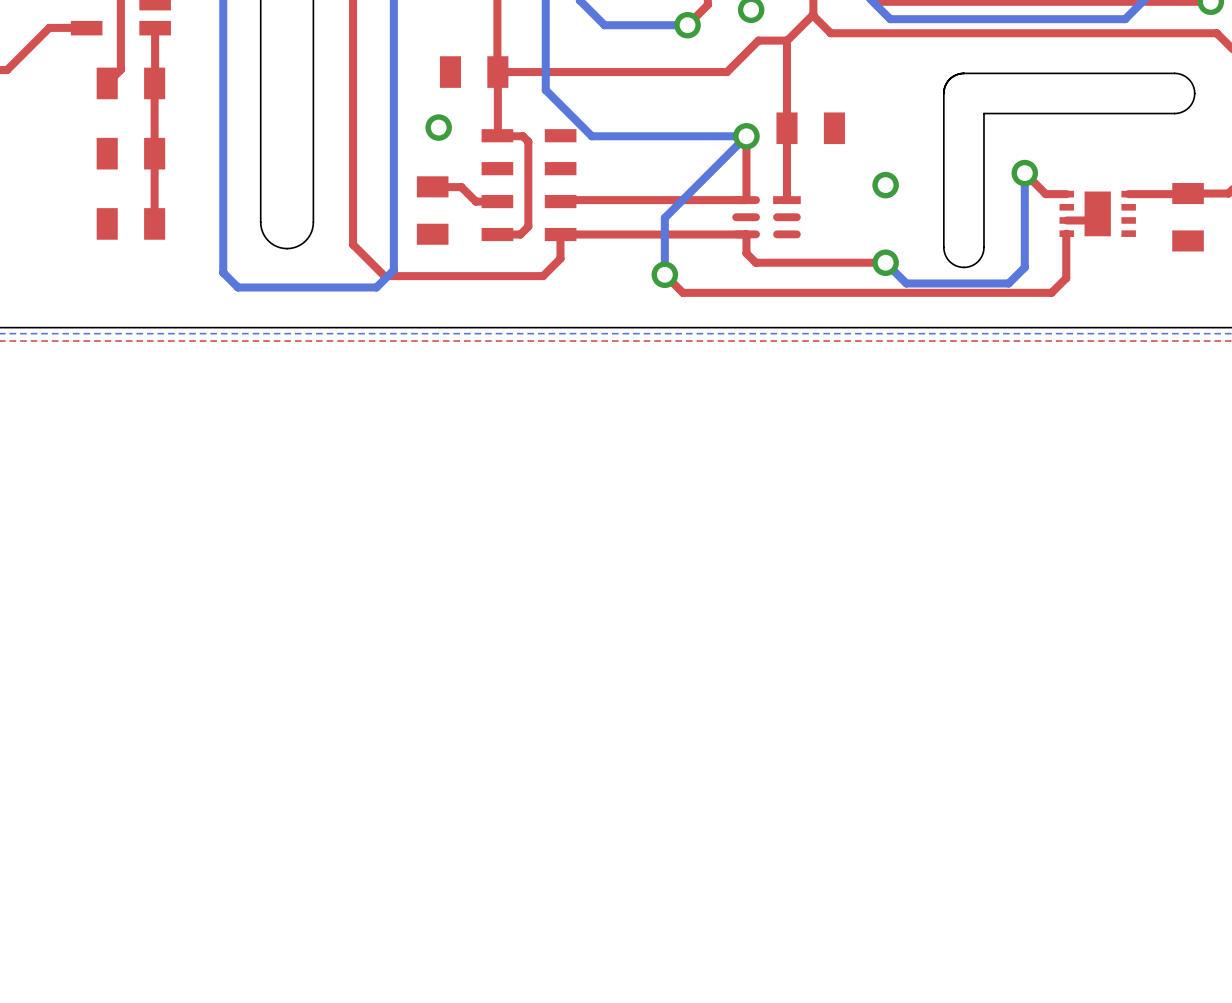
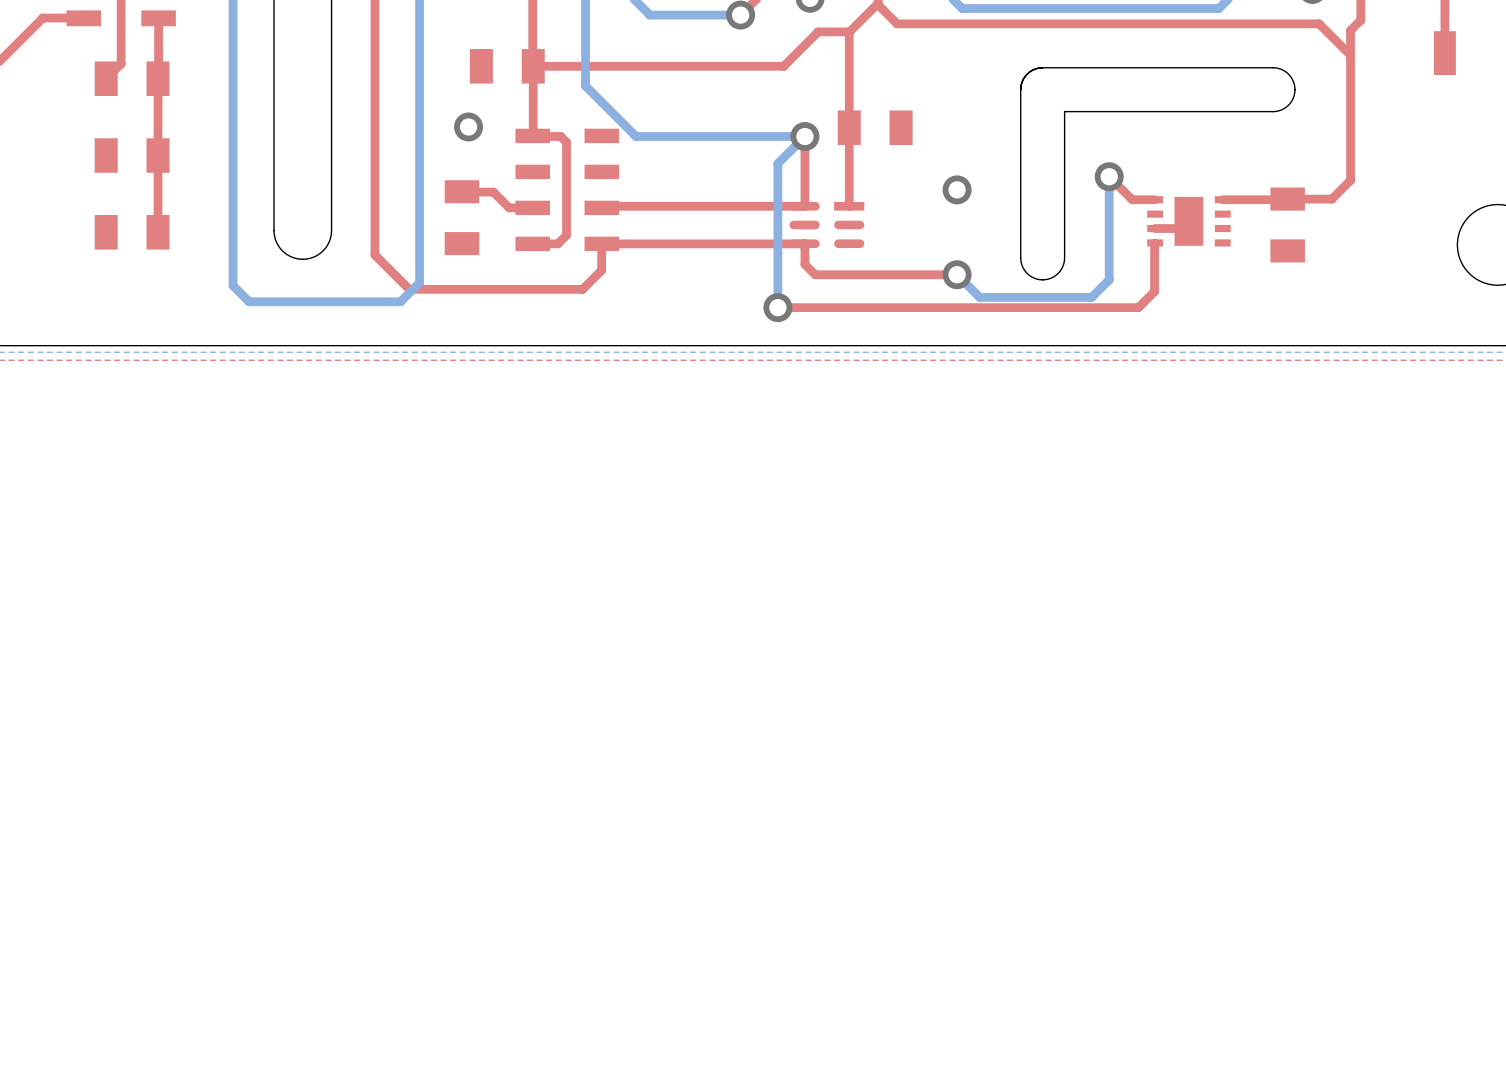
bottom track: (721, 161) (664, 217) (664, 274) -> (777, 163) (777, 307)
top track: (664, 274) (682, 292) (721, 292) -> none
via position: (664, 274) -> (777, 307)

